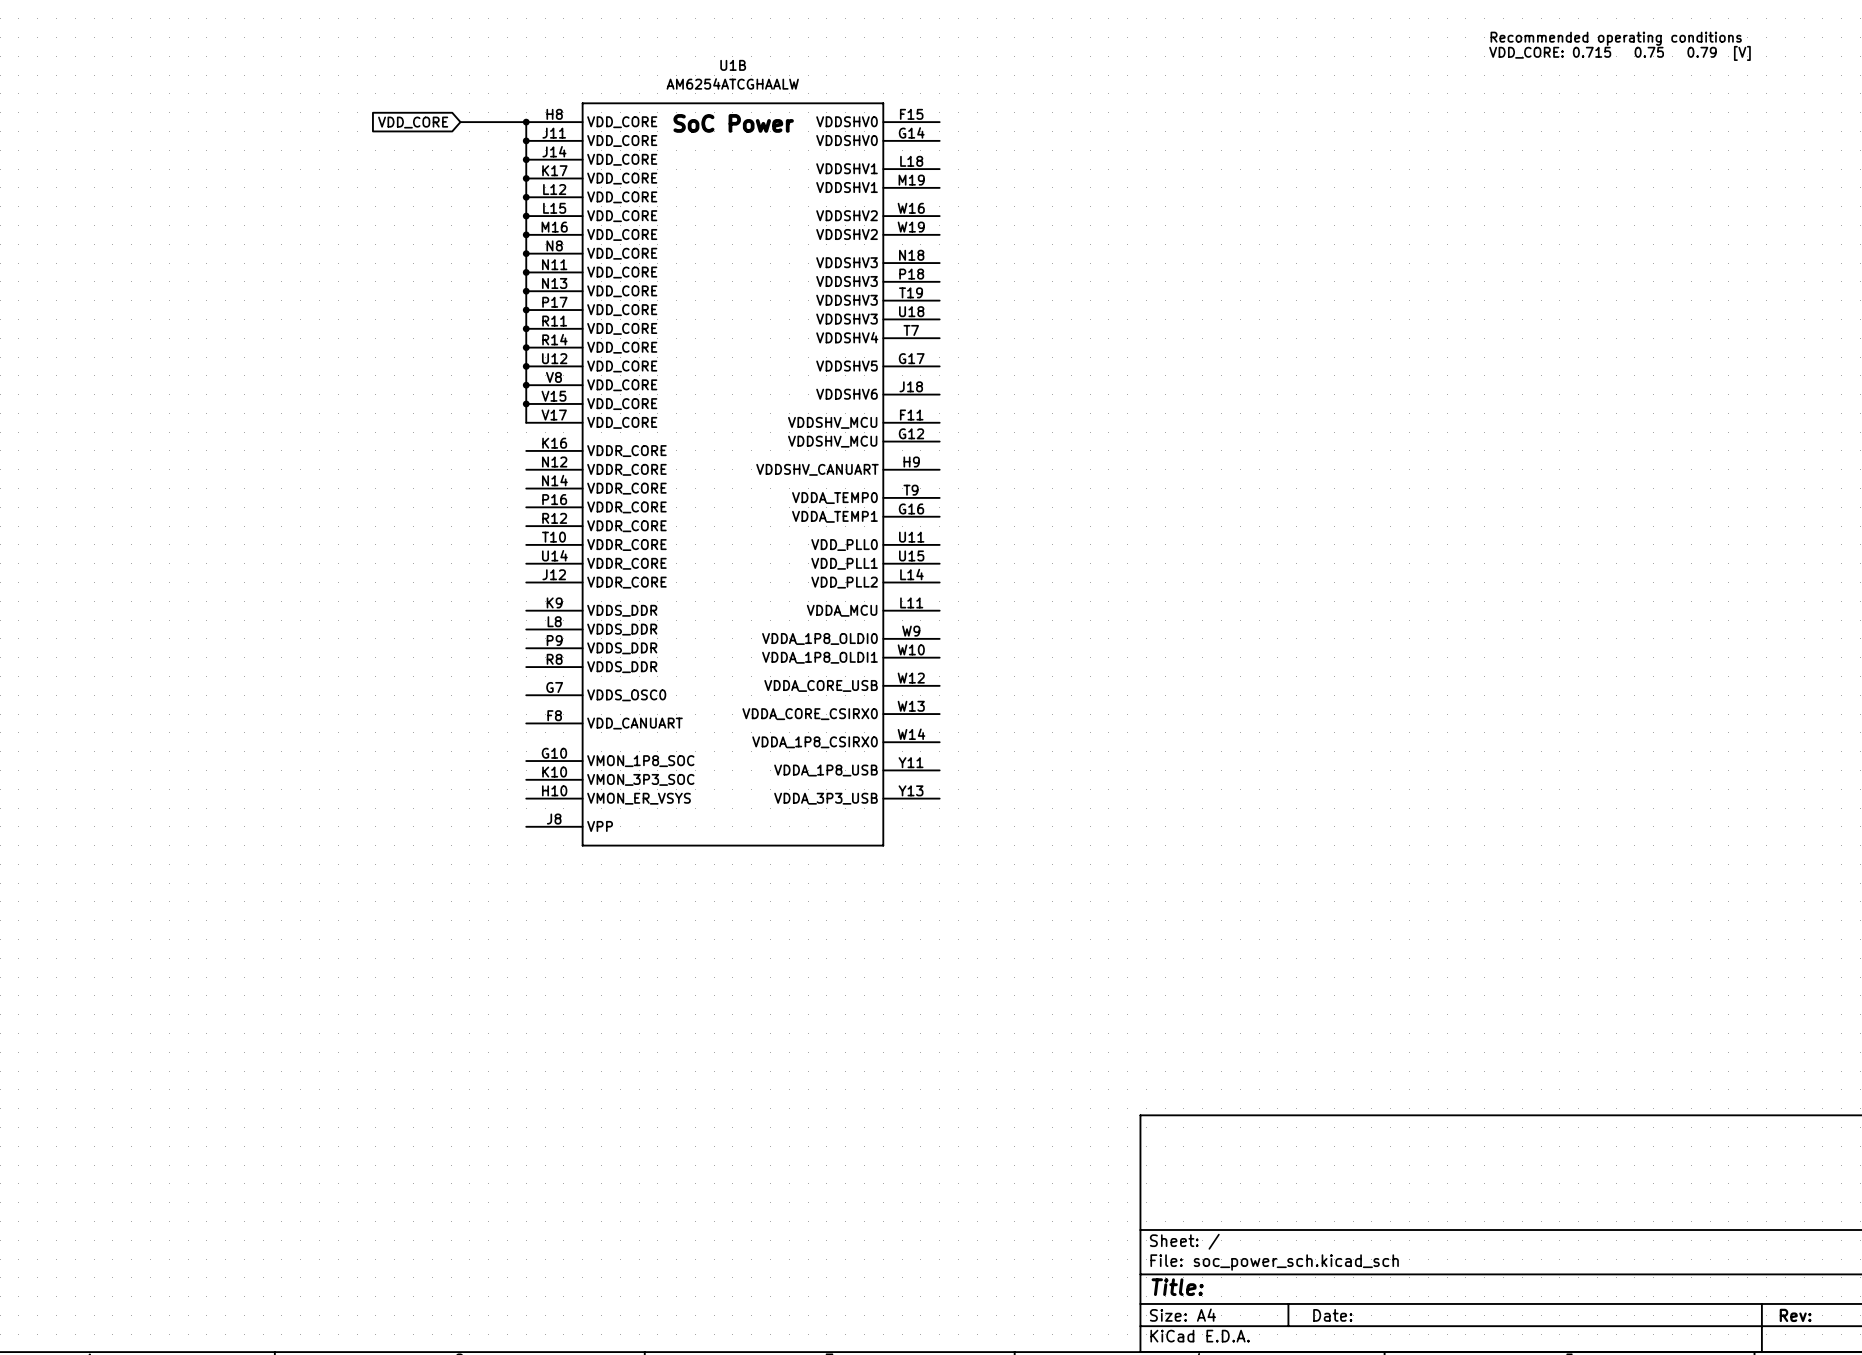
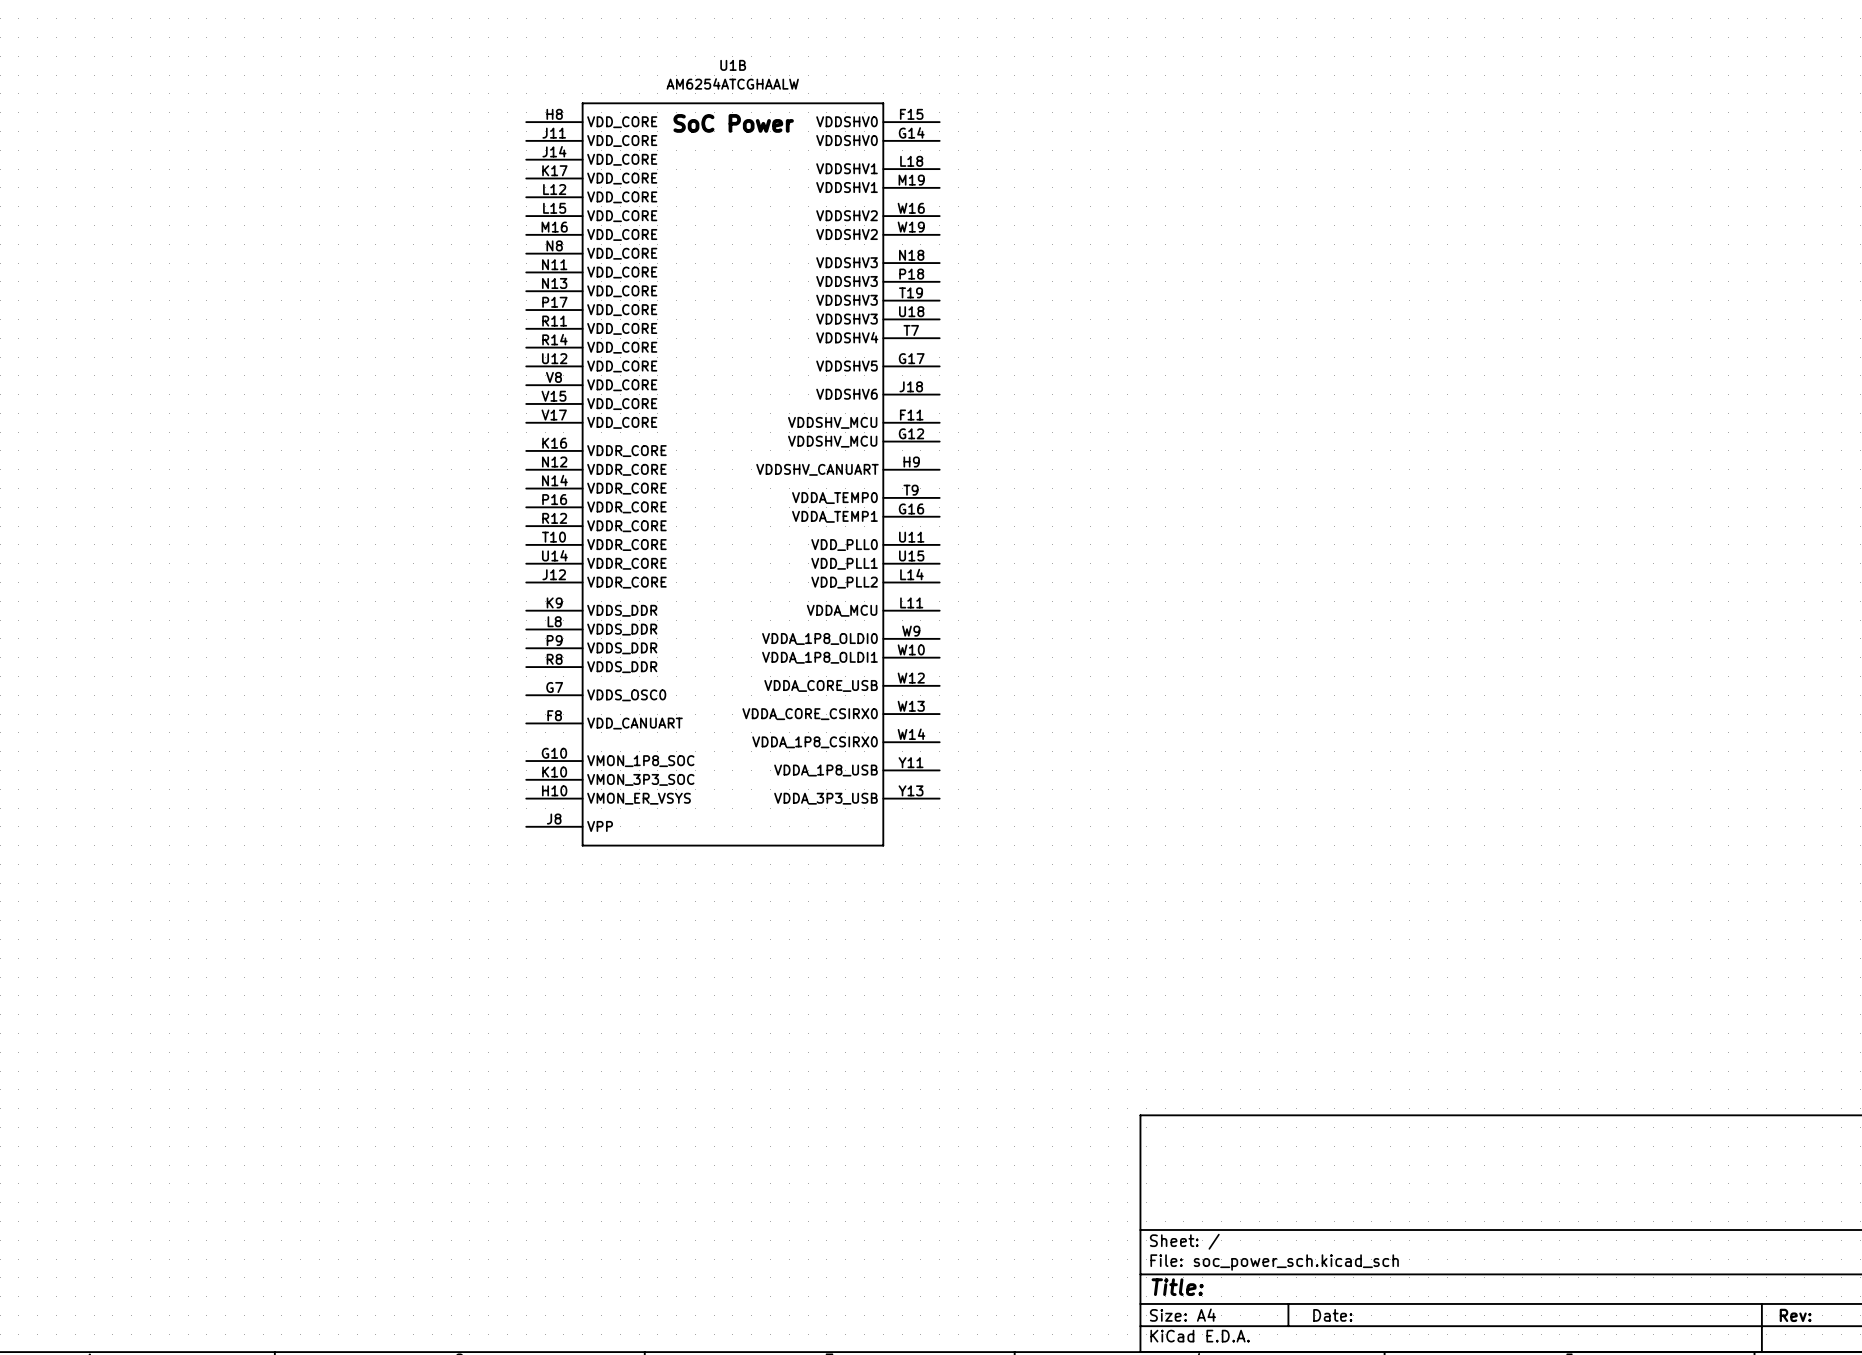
text: Recommended operating conditions (1616, 38) -> none
text: VDD_CORE: 0.715 0.75 0.79 [V] (1619, 53) -> none
global label: VDD_CORE (413, 122) -> none
wire: (460, 122) (526, 122) (526, 422) -> none
junction: (526, 122) -> none
junction: (526, 140) -> none
junction: (526, 159) -> none
junction: (526, 178) -> none
junction: (526, 197) -> none
junction: (526, 216) -> none
junction: (526, 234) -> none
junction: (526, 253) -> none
junction: (526, 272) -> none
junction: (526, 291) -> none
junction: (526, 310) -> none
junction: (526, 328) -> none
junction: (526, 347) -> none
junction: (526, 366) -> none
junction: (526, 385) -> none
junction: (526, 403) -> none

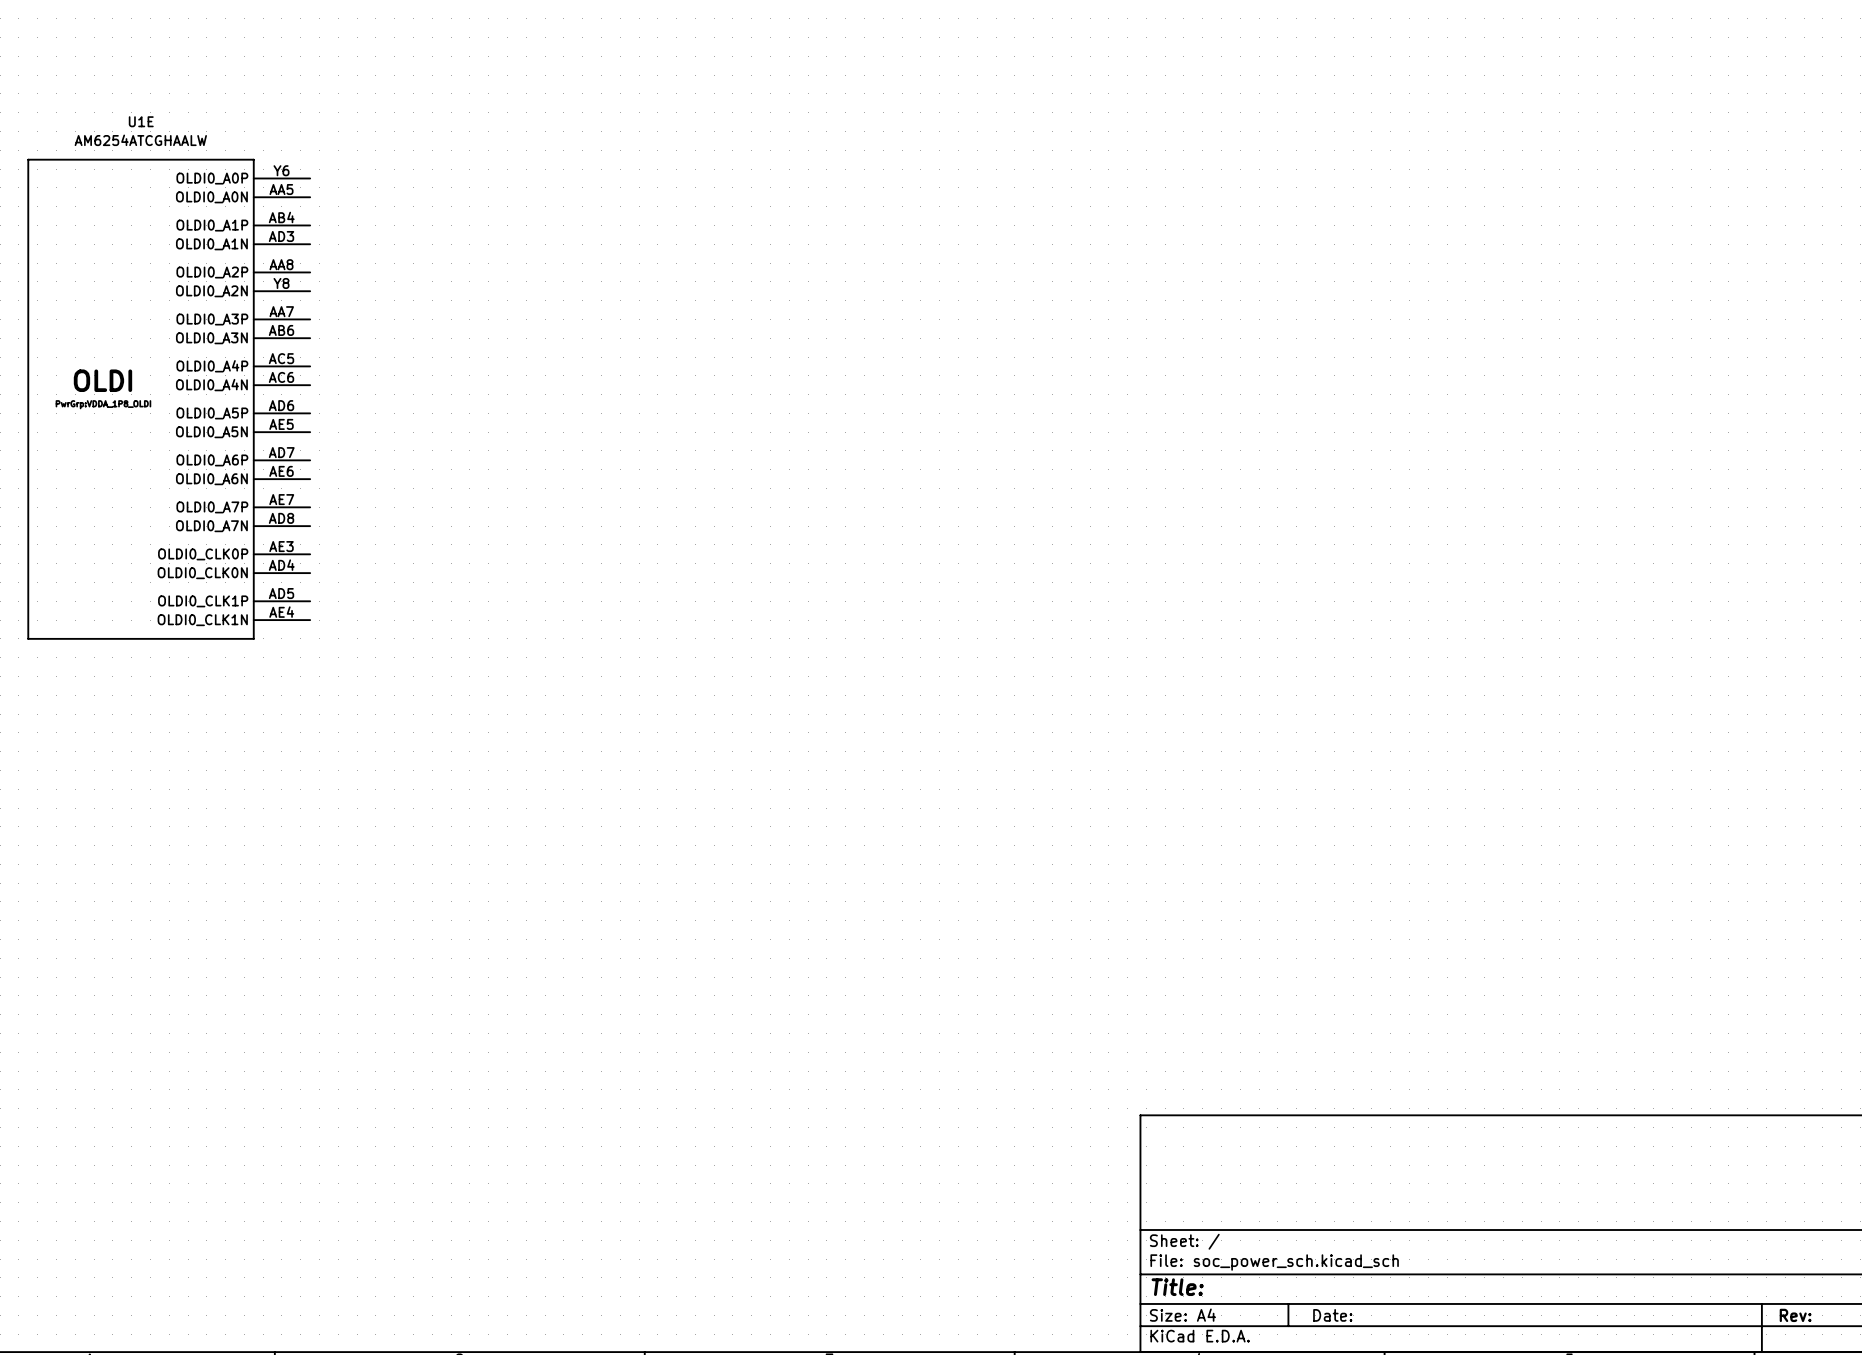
U1E: none -> AM6254ATCGHAALW (168, 399)
U1B: AM6254ATCGHAALW (732, 474) -> none

